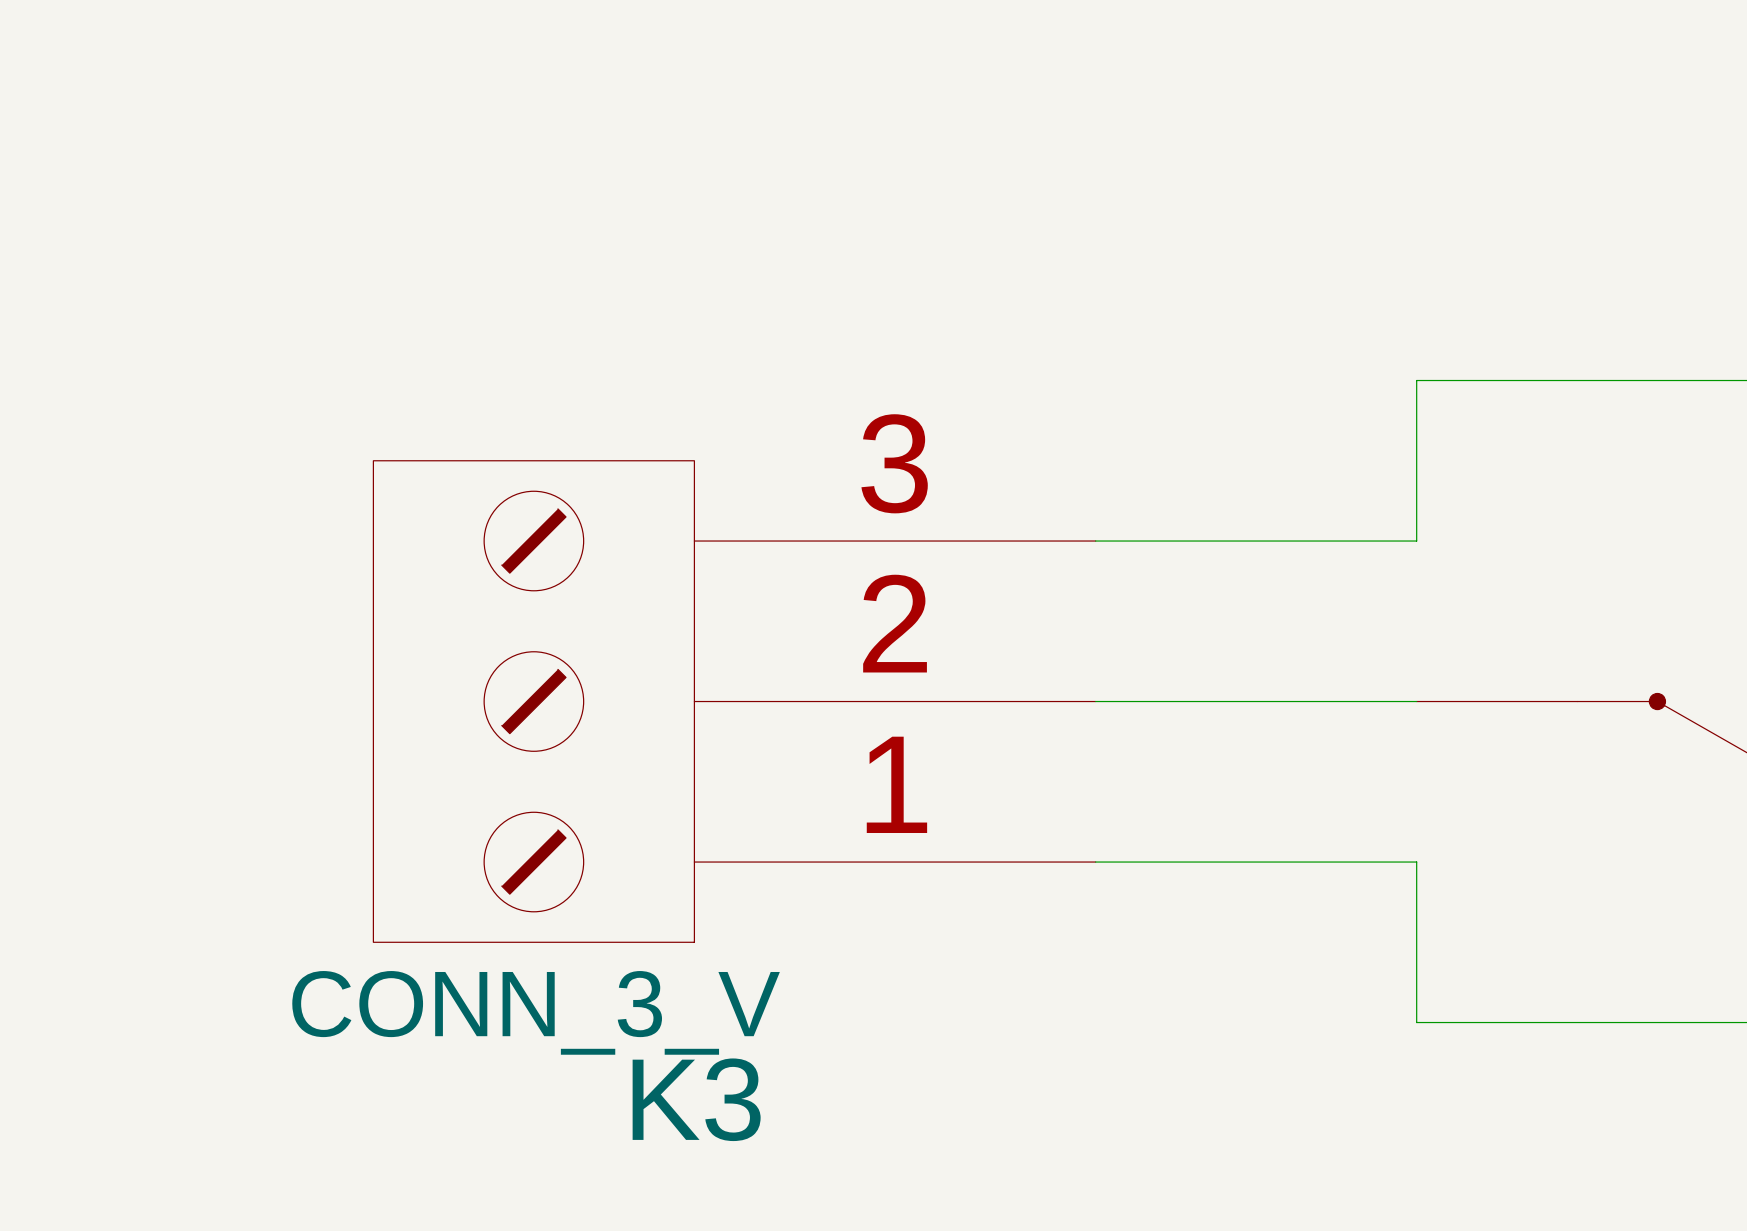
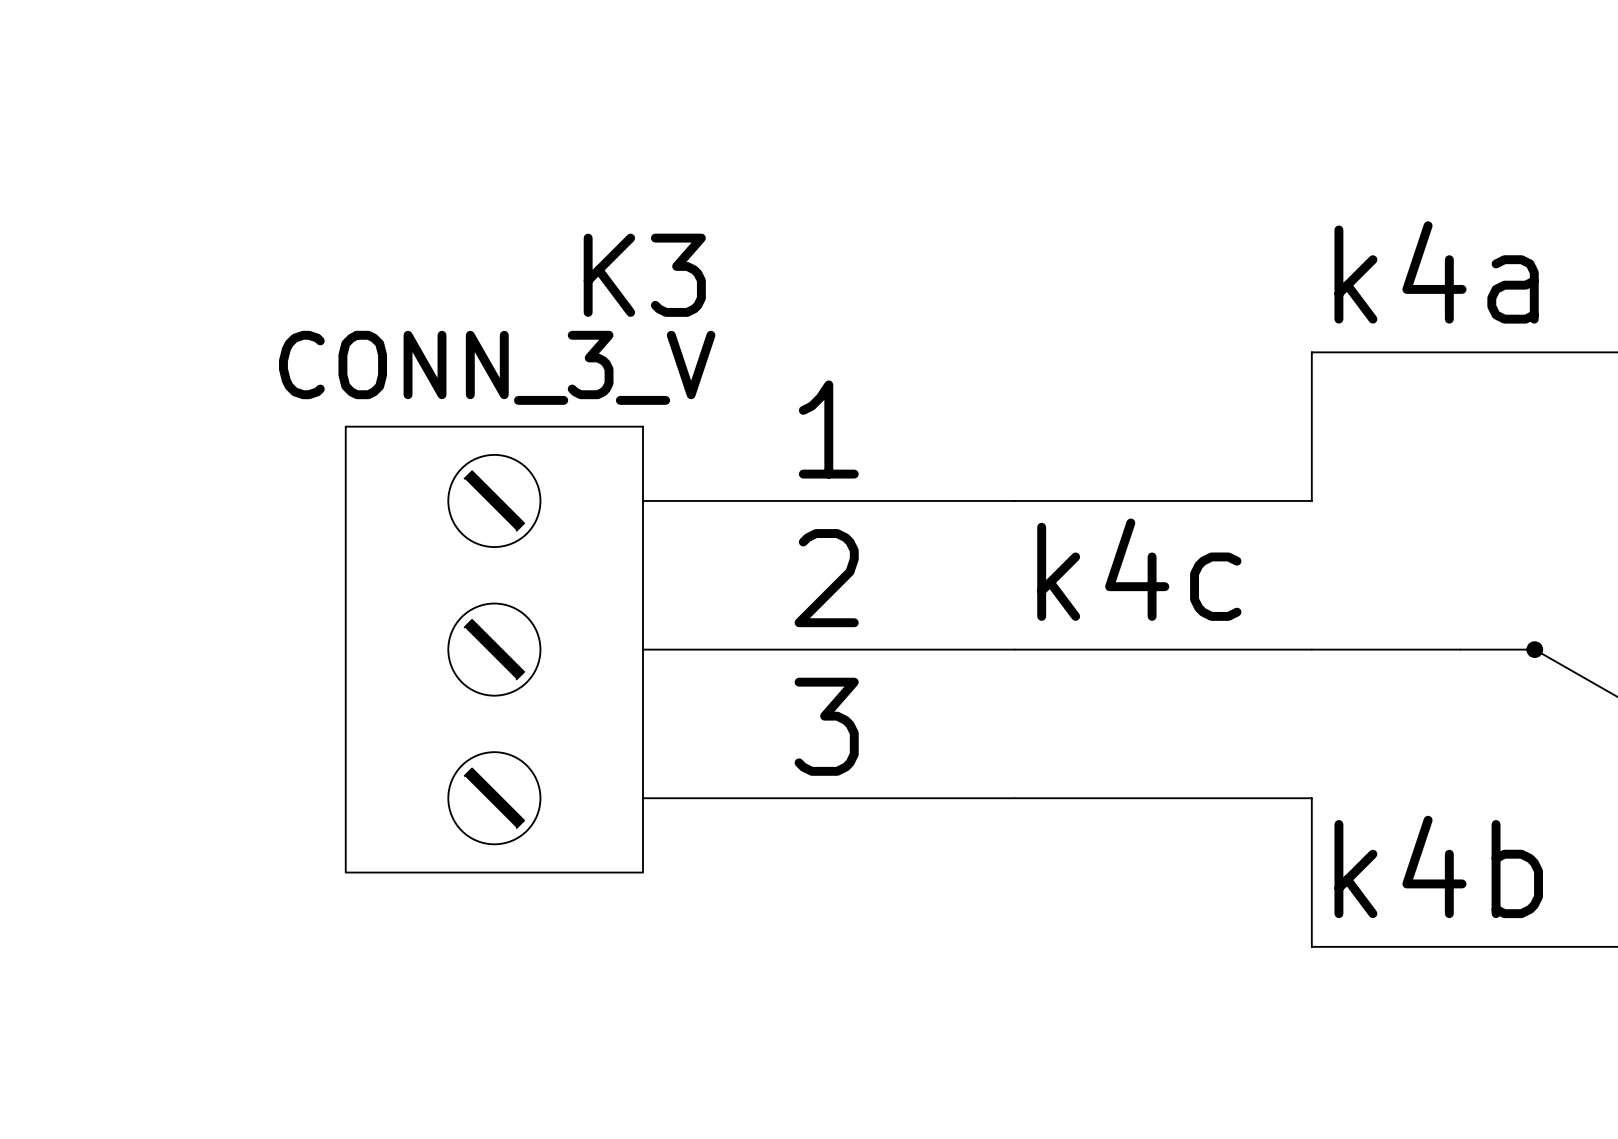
label: none -> k4a (1436, 272)
label: none -> k4c (1139, 569)
K3 flip: as is (421, 701) -> up-down (390, 649)
label: none -> k4b (1438, 866)

